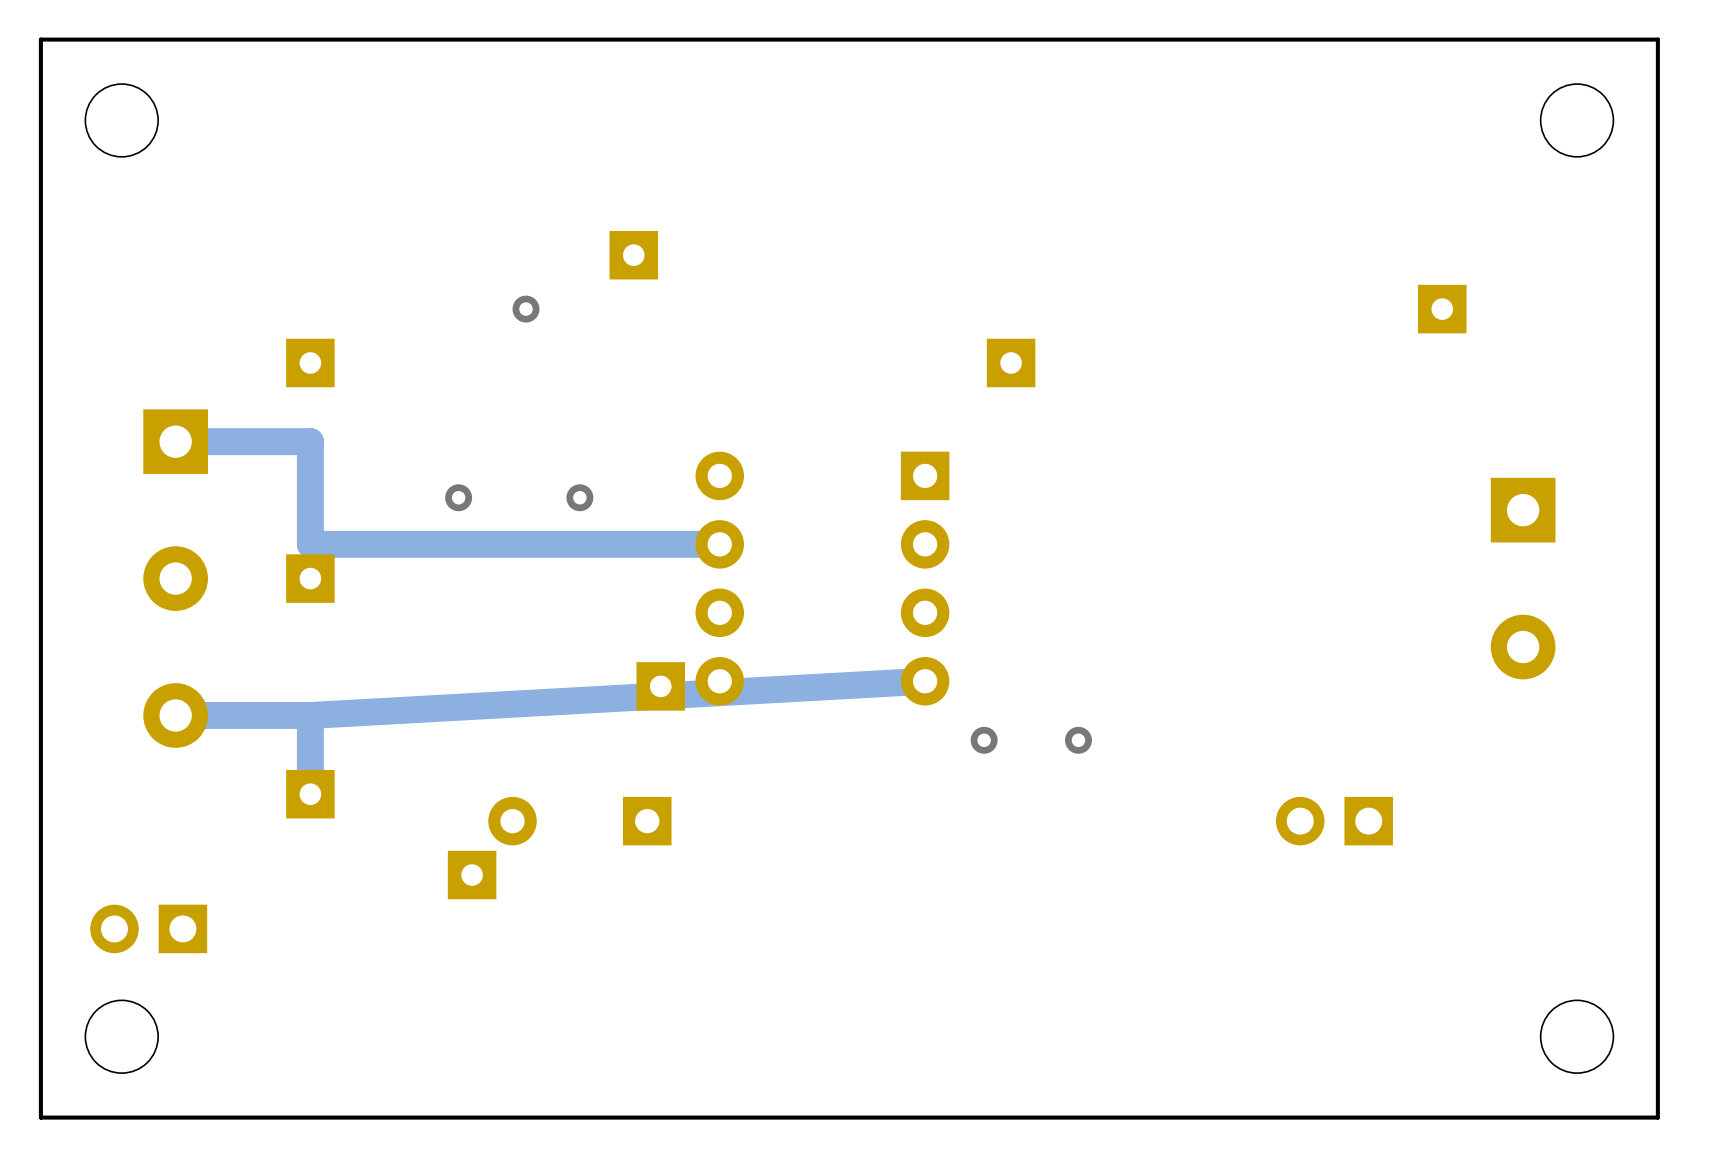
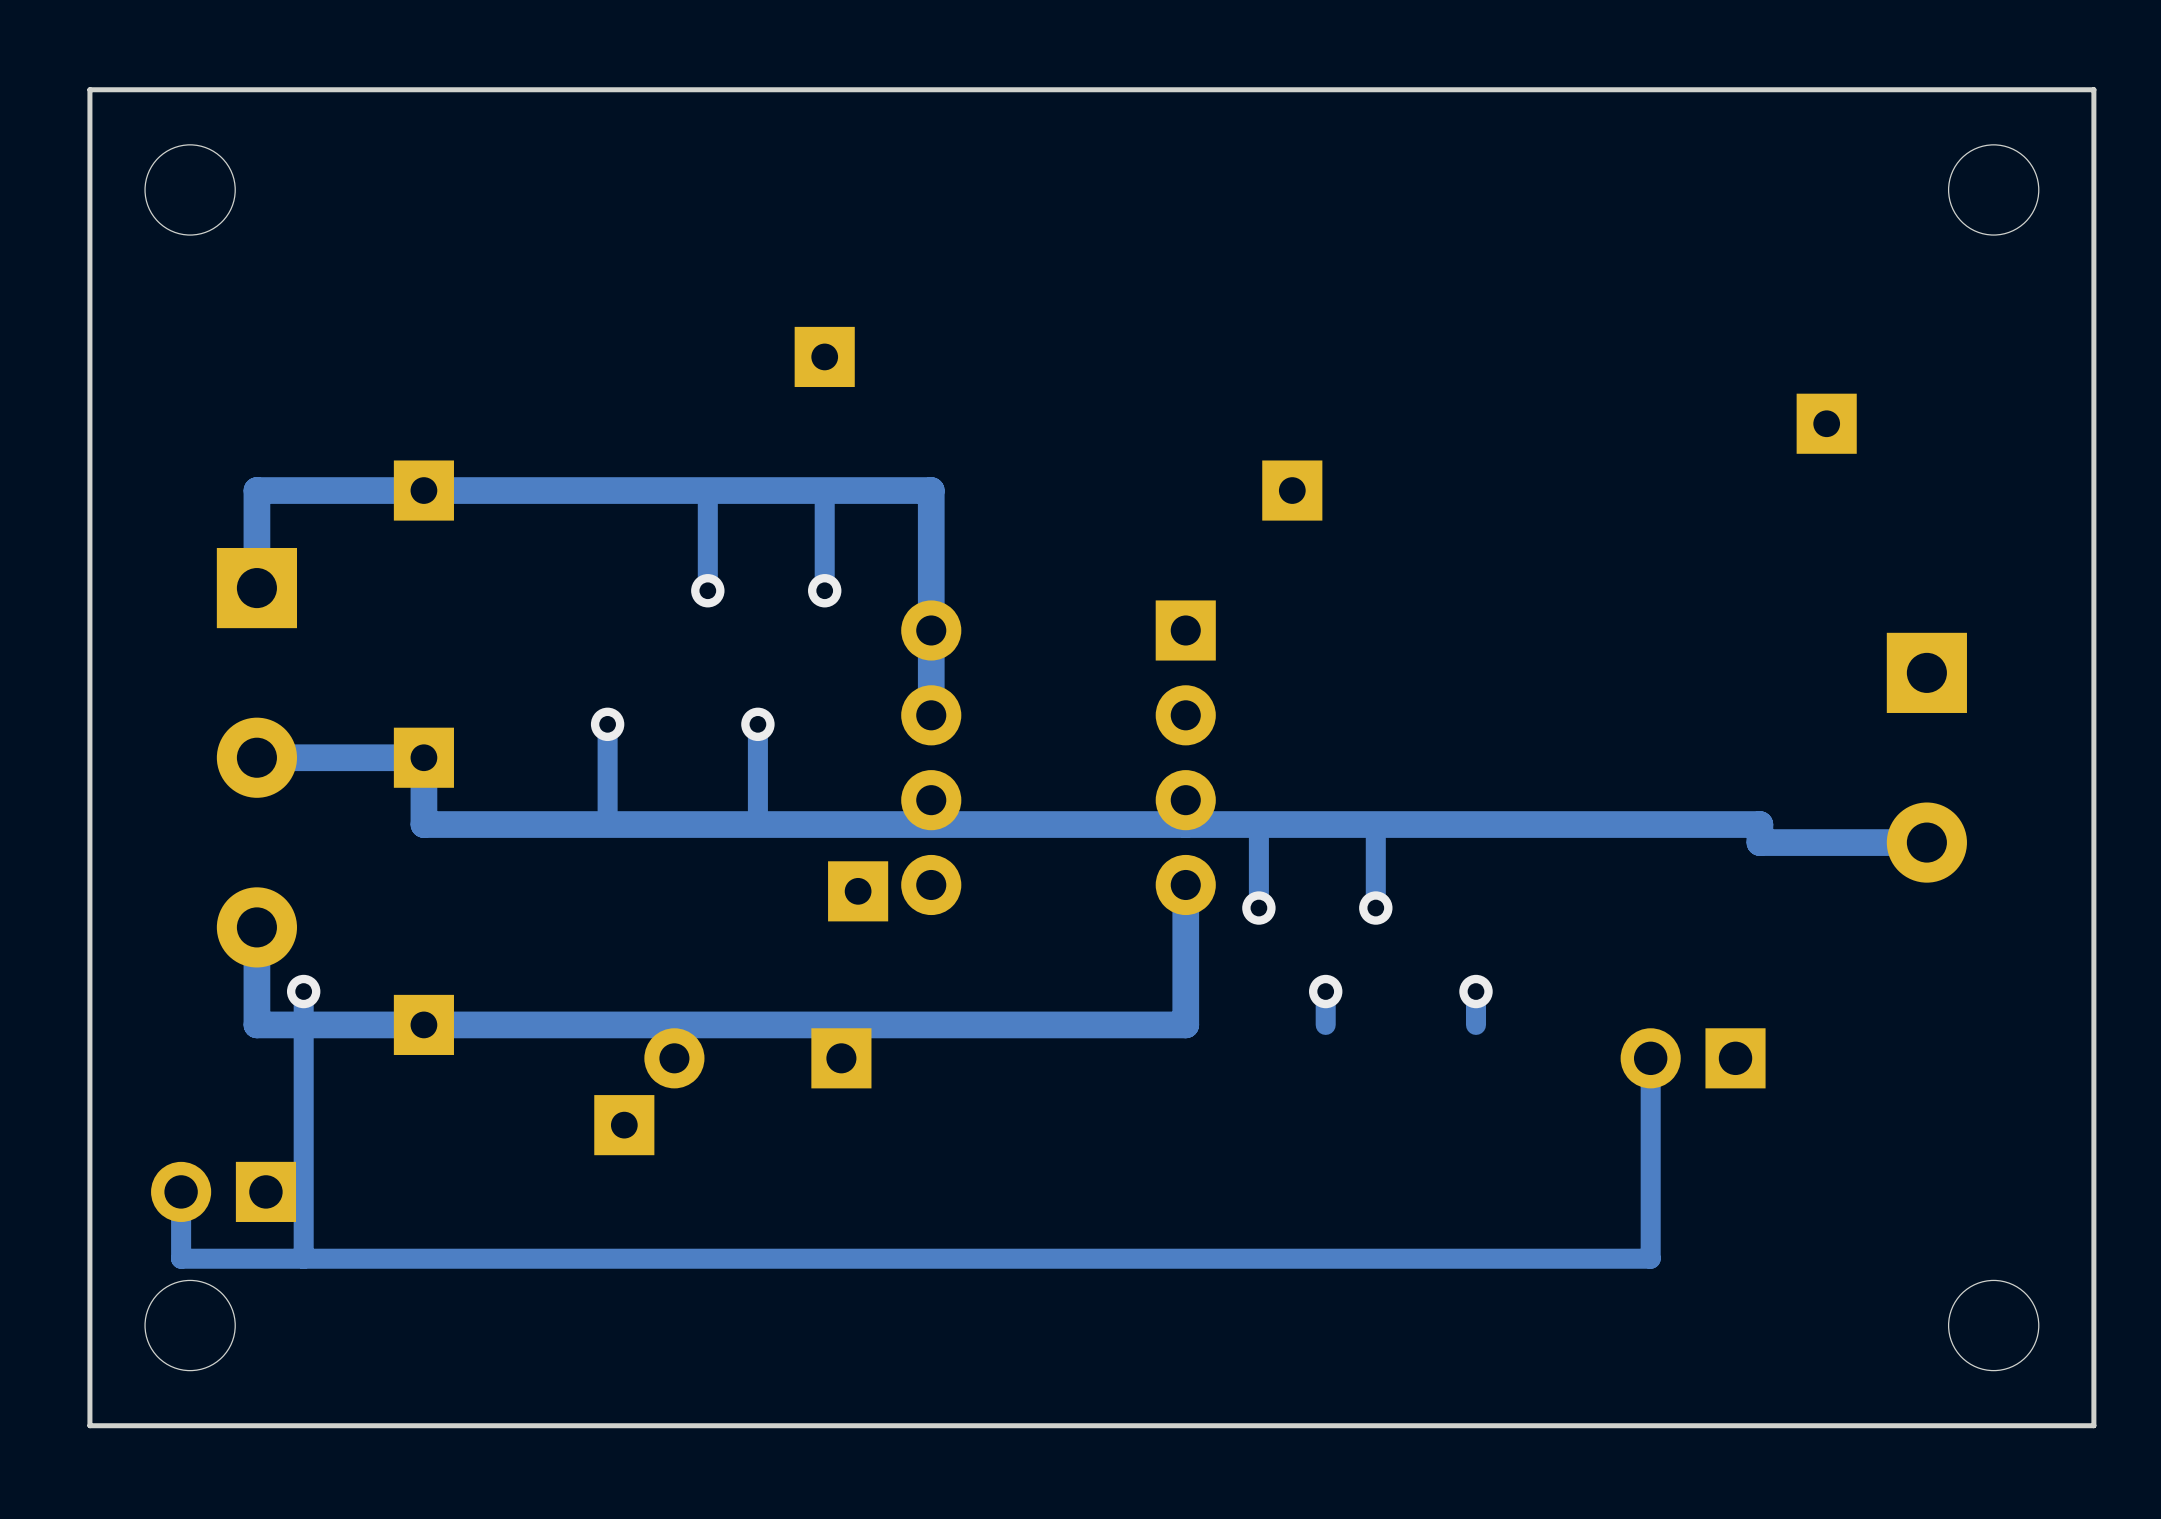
via: (525, 309) -> none
track: none -> (707, 490) (707, 590)
track: none -> (824, 490) (824, 590)
track: (175, 441) (310, 441) (310, 544) (719, 544) -> (256, 588) (256, 490) (931, 490) (931, 715)
via: none -> (707, 590)
via: none -> (824, 590)
via: (458, 497) -> none
via: (579, 497) -> none
track: none -> (607, 724) (607, 824)
via: none -> (607, 724)
track: none -> (757, 724) (757, 824)
via: none -> (757, 724)
track: none -> (256, 757) (423, 757) (423, 824) (1759, 824) (1759, 842) (1926, 842)
track: none -> (1258, 824) (1258, 908)
track: none -> (1375, 824) (1375, 908)
track: (925, 681) (310, 715) -> (1185, 884) (1185, 1024) (256, 1024) (256, 927)
via: none -> (1258, 908)
via: none -> (1375, 908)
track: (310, 715) (310, 794) -> none
track: (310, 715) (175, 715) -> none
via: (984, 740) -> none
via: (1078, 740) -> none
track: none -> (303, 991) (303, 1258)
via: none -> (303, 991)
track: none -> (1325, 991) (1325, 1024)
via: none -> (1325, 991)
track: none -> (1476, 991) (1476, 1024)
via: none -> (1476, 991)
track: none -> (1650, 1058) (1650, 1258) (181, 1258) (181, 1191)

